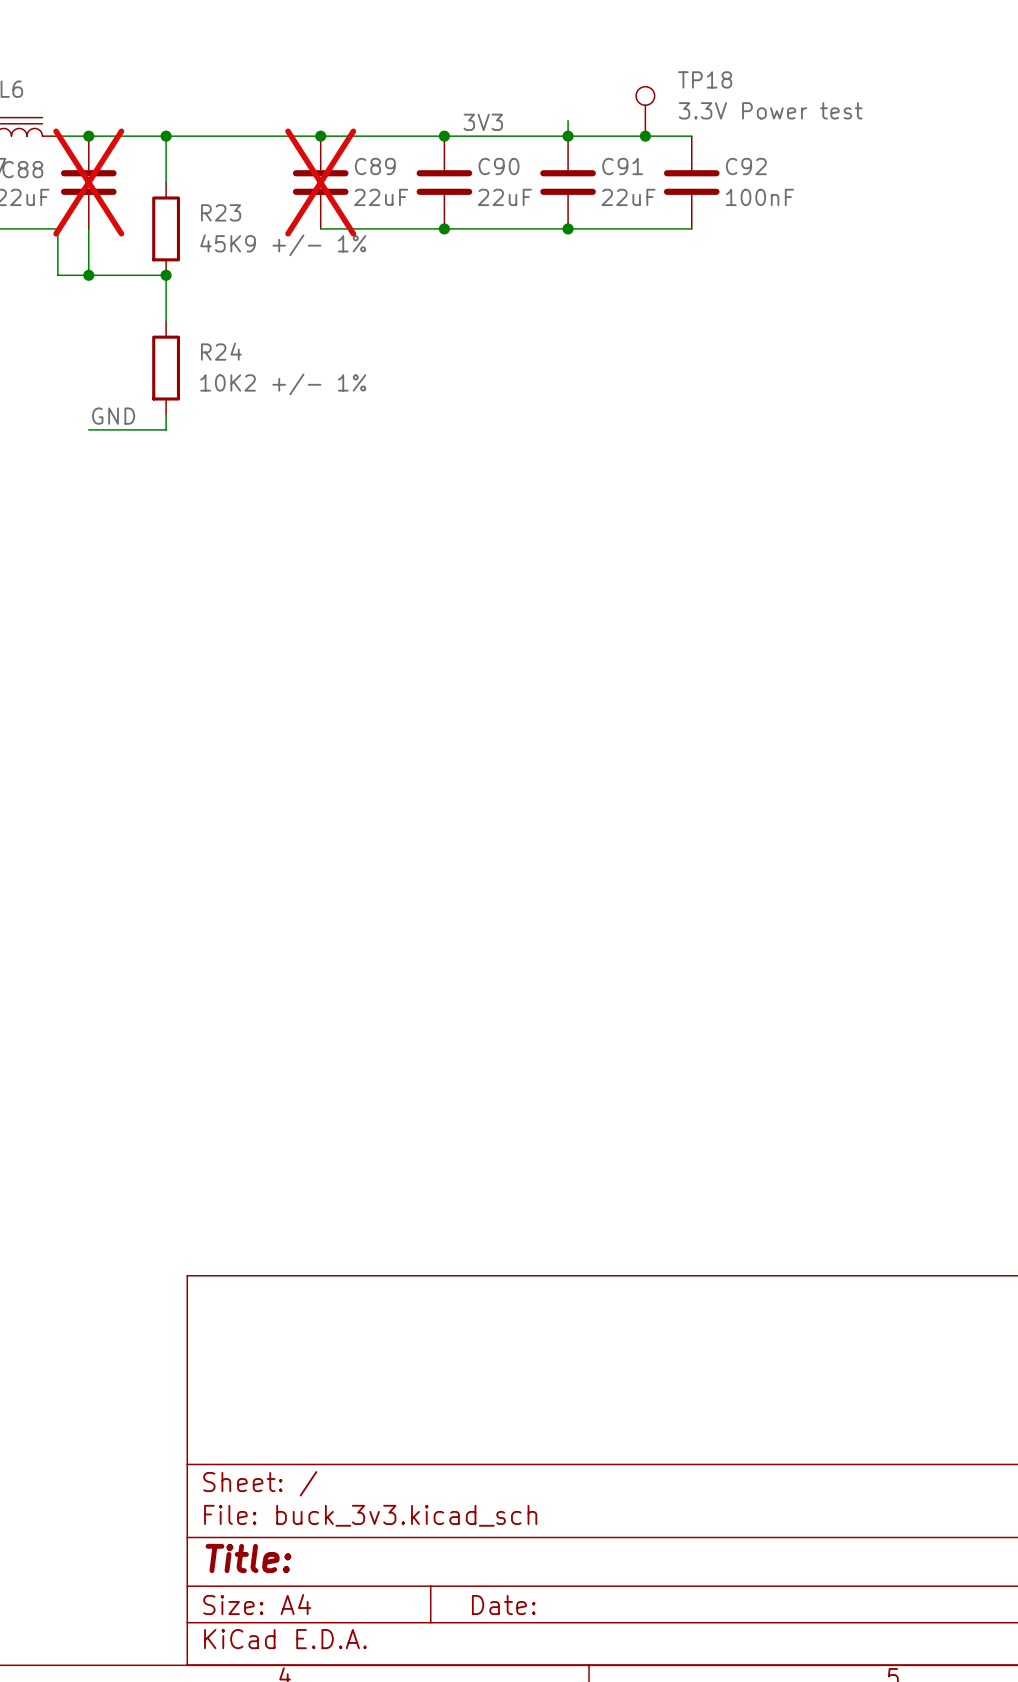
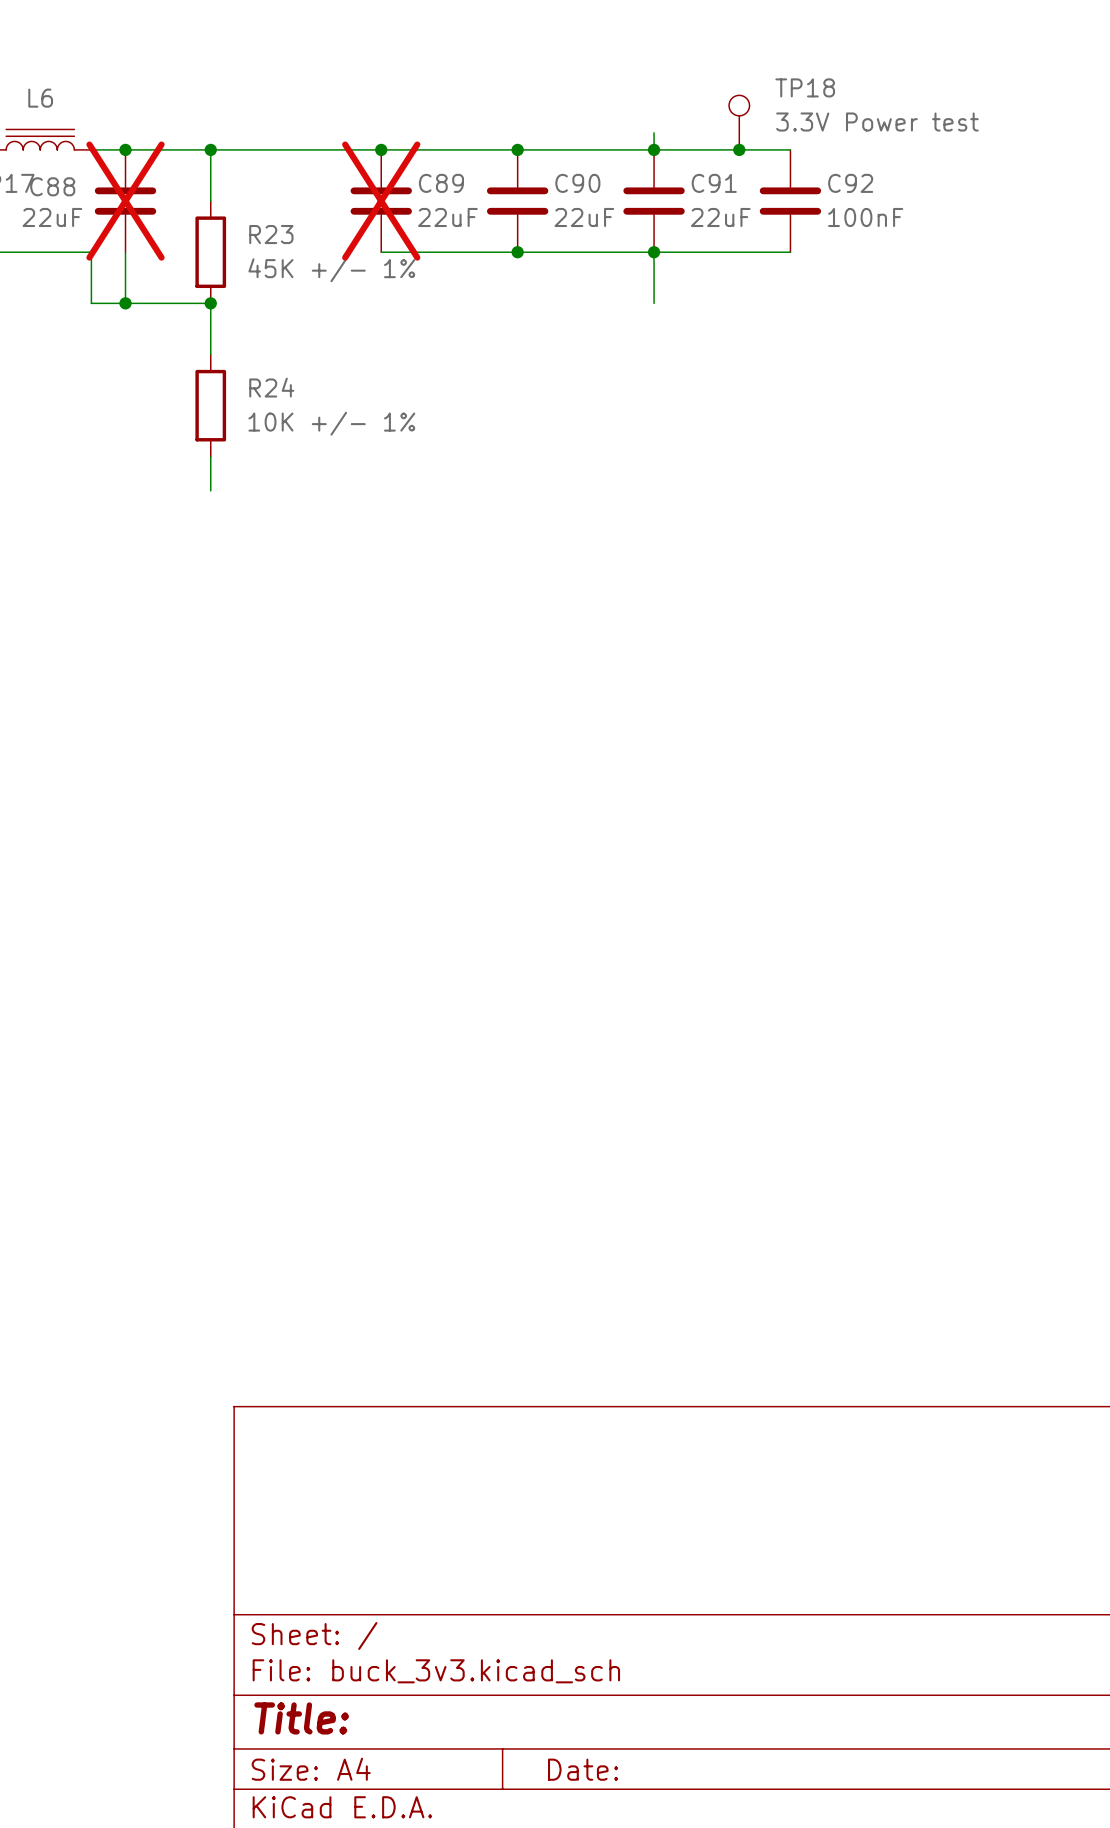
label: 3V3 (483, 122) -> none
wire: none -> (654, 252) (654, 303)
R23 value: 45K9 +/- 1% (283, 245) -> 45K +/- 1% (331, 270)
R24 value: 10K2 +/- 1% (283, 384) -> 10K +/- 1% (331, 423)
label: GND (113, 416) -> none
wire: (88, 429) (166, 429) -> (210, 490) (210, 473)

